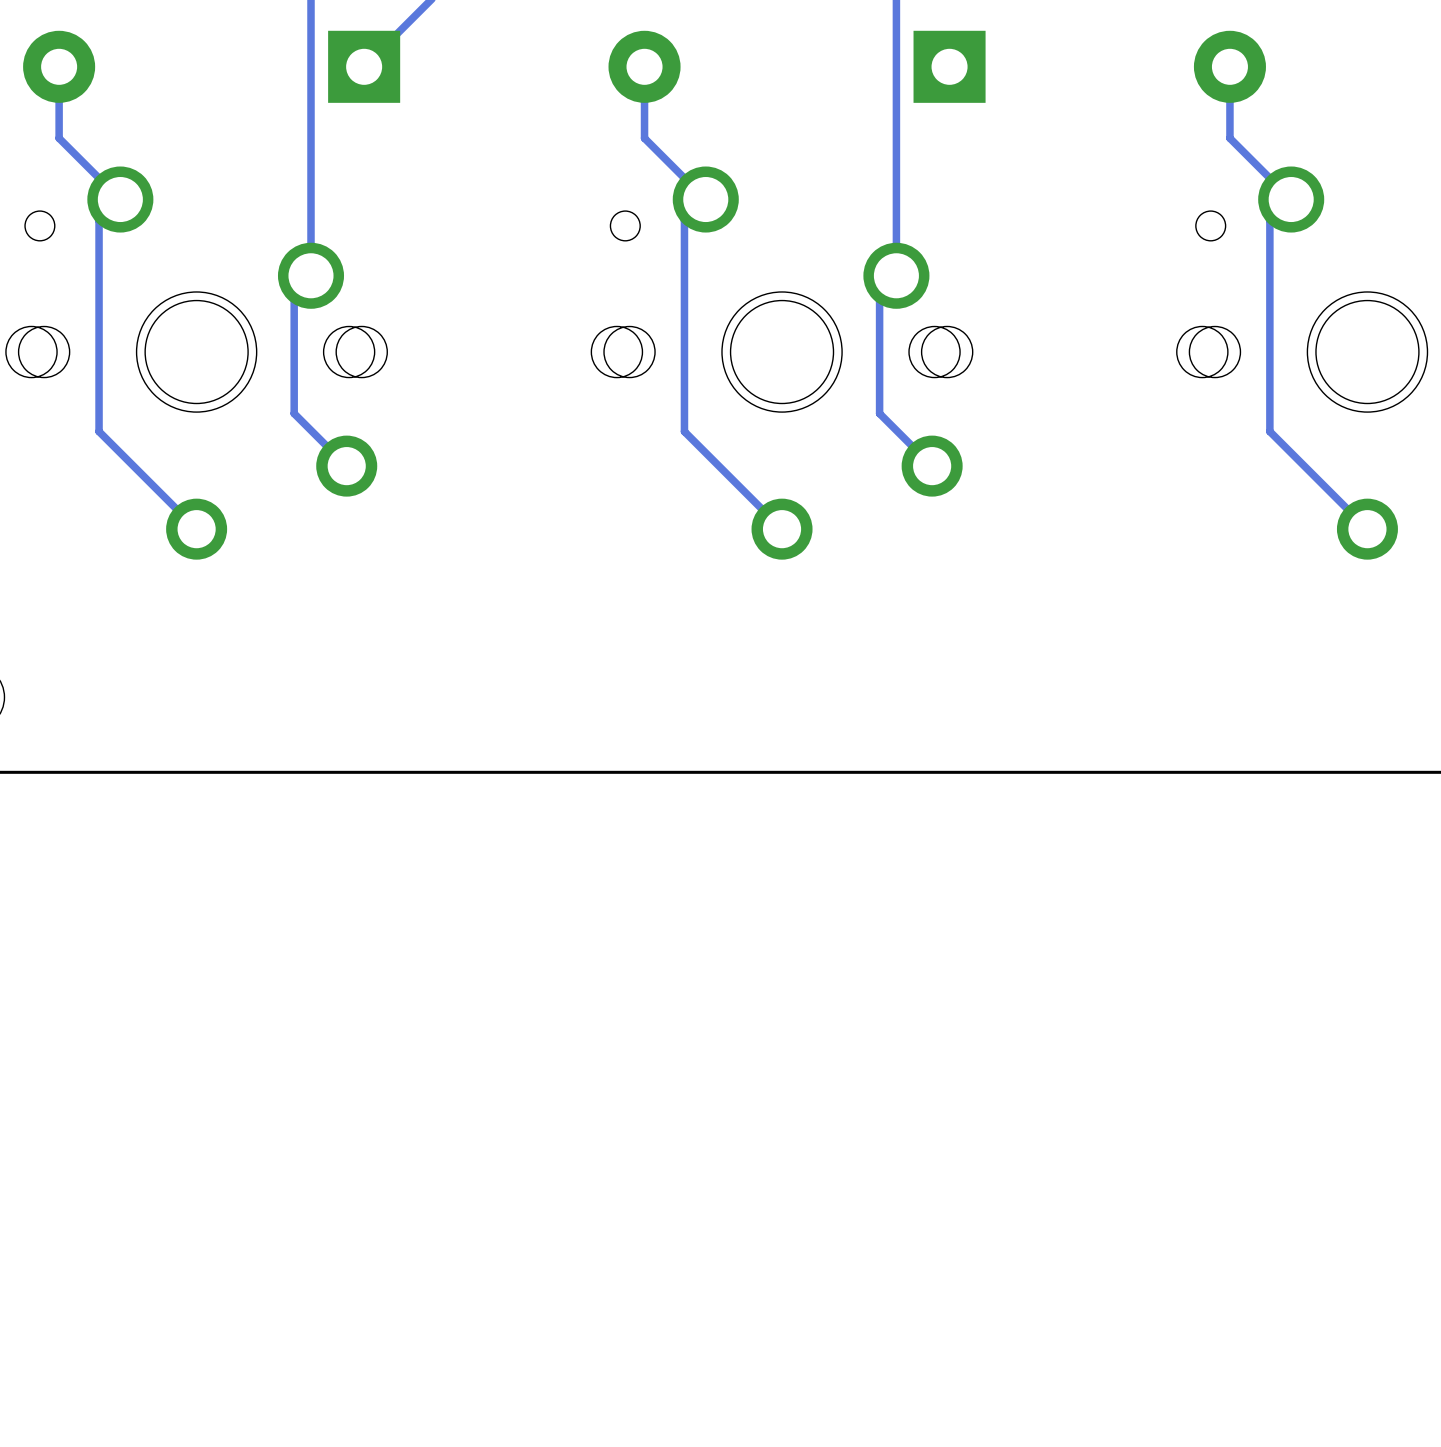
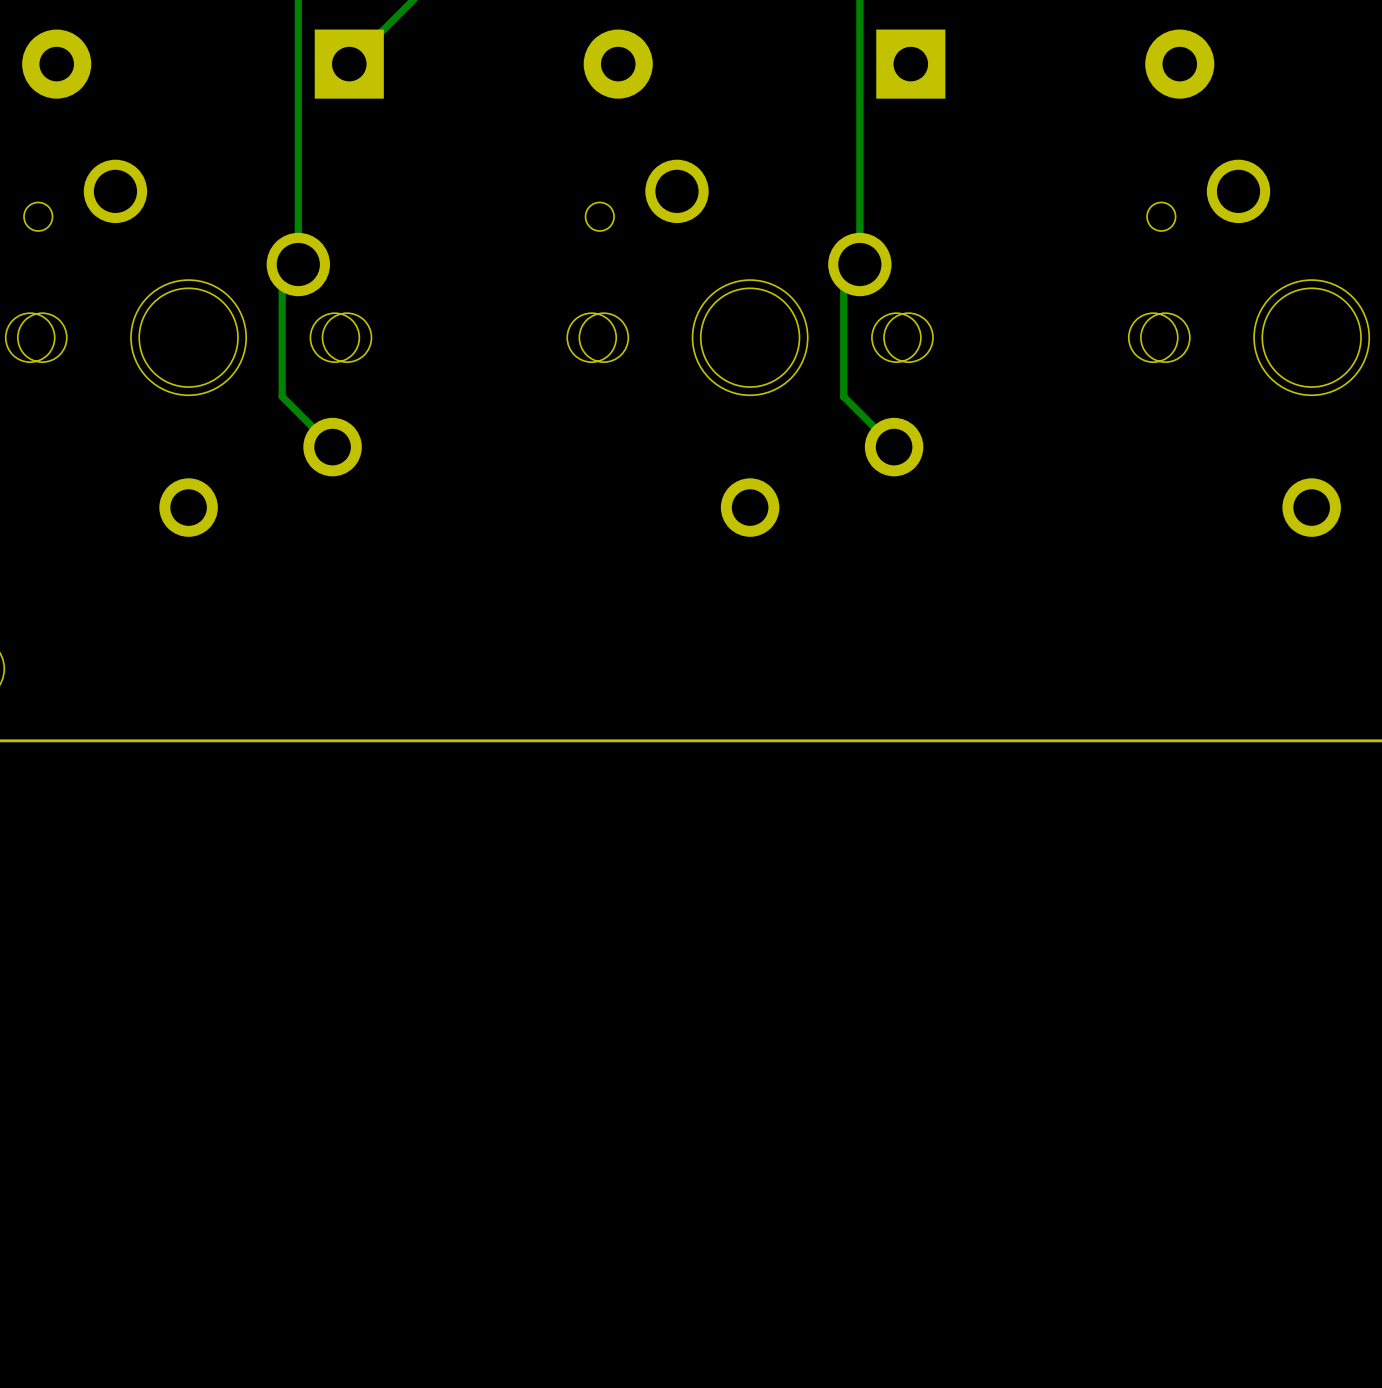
track: (59, 66) (59, 138) (120, 199) (99, 220) (99, 431) (196, 529) -> none
track: (644, 66) (644, 138) (705, 199) (684, 220) (684, 431) (782, 529) -> none
track: (1229, 66) (1229, 138) (1291, 199) (1269, 220) (1269, 431) (1367, 529) -> none

